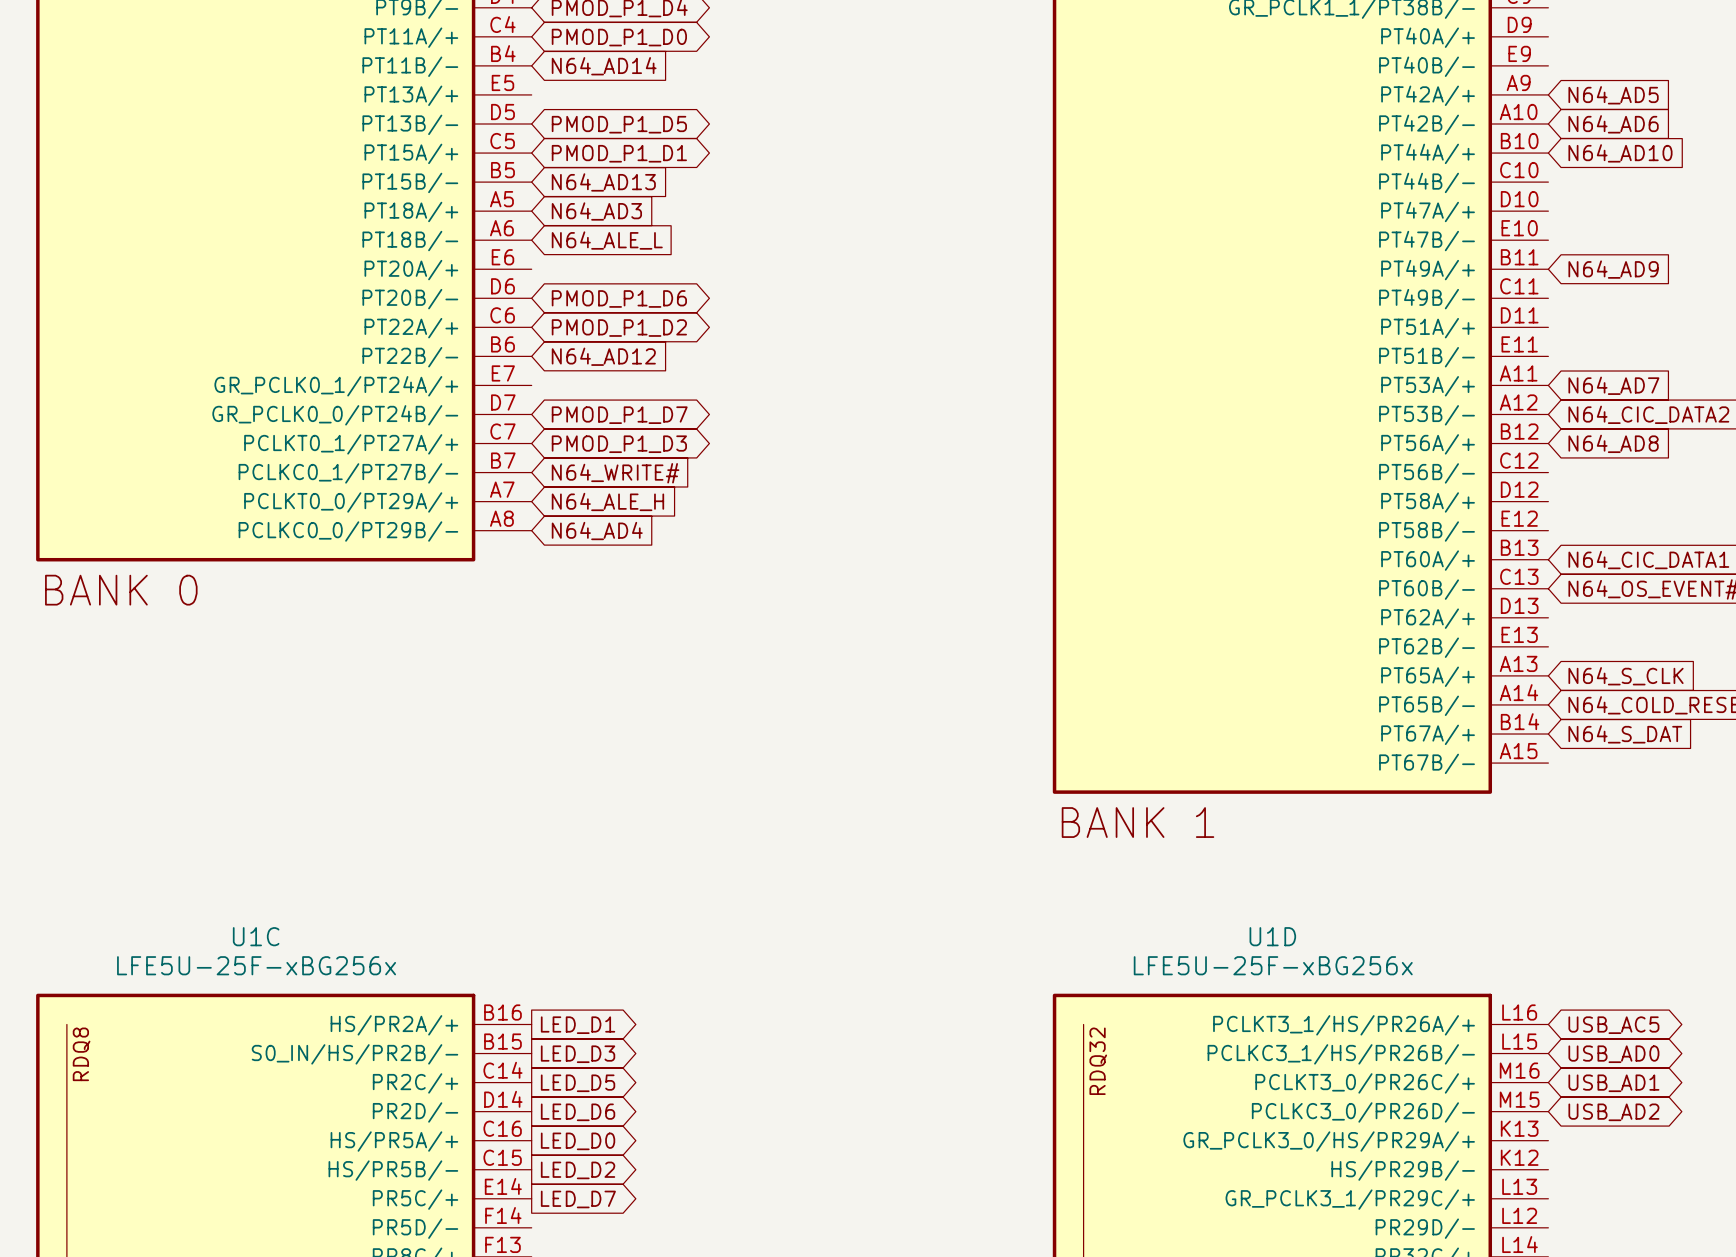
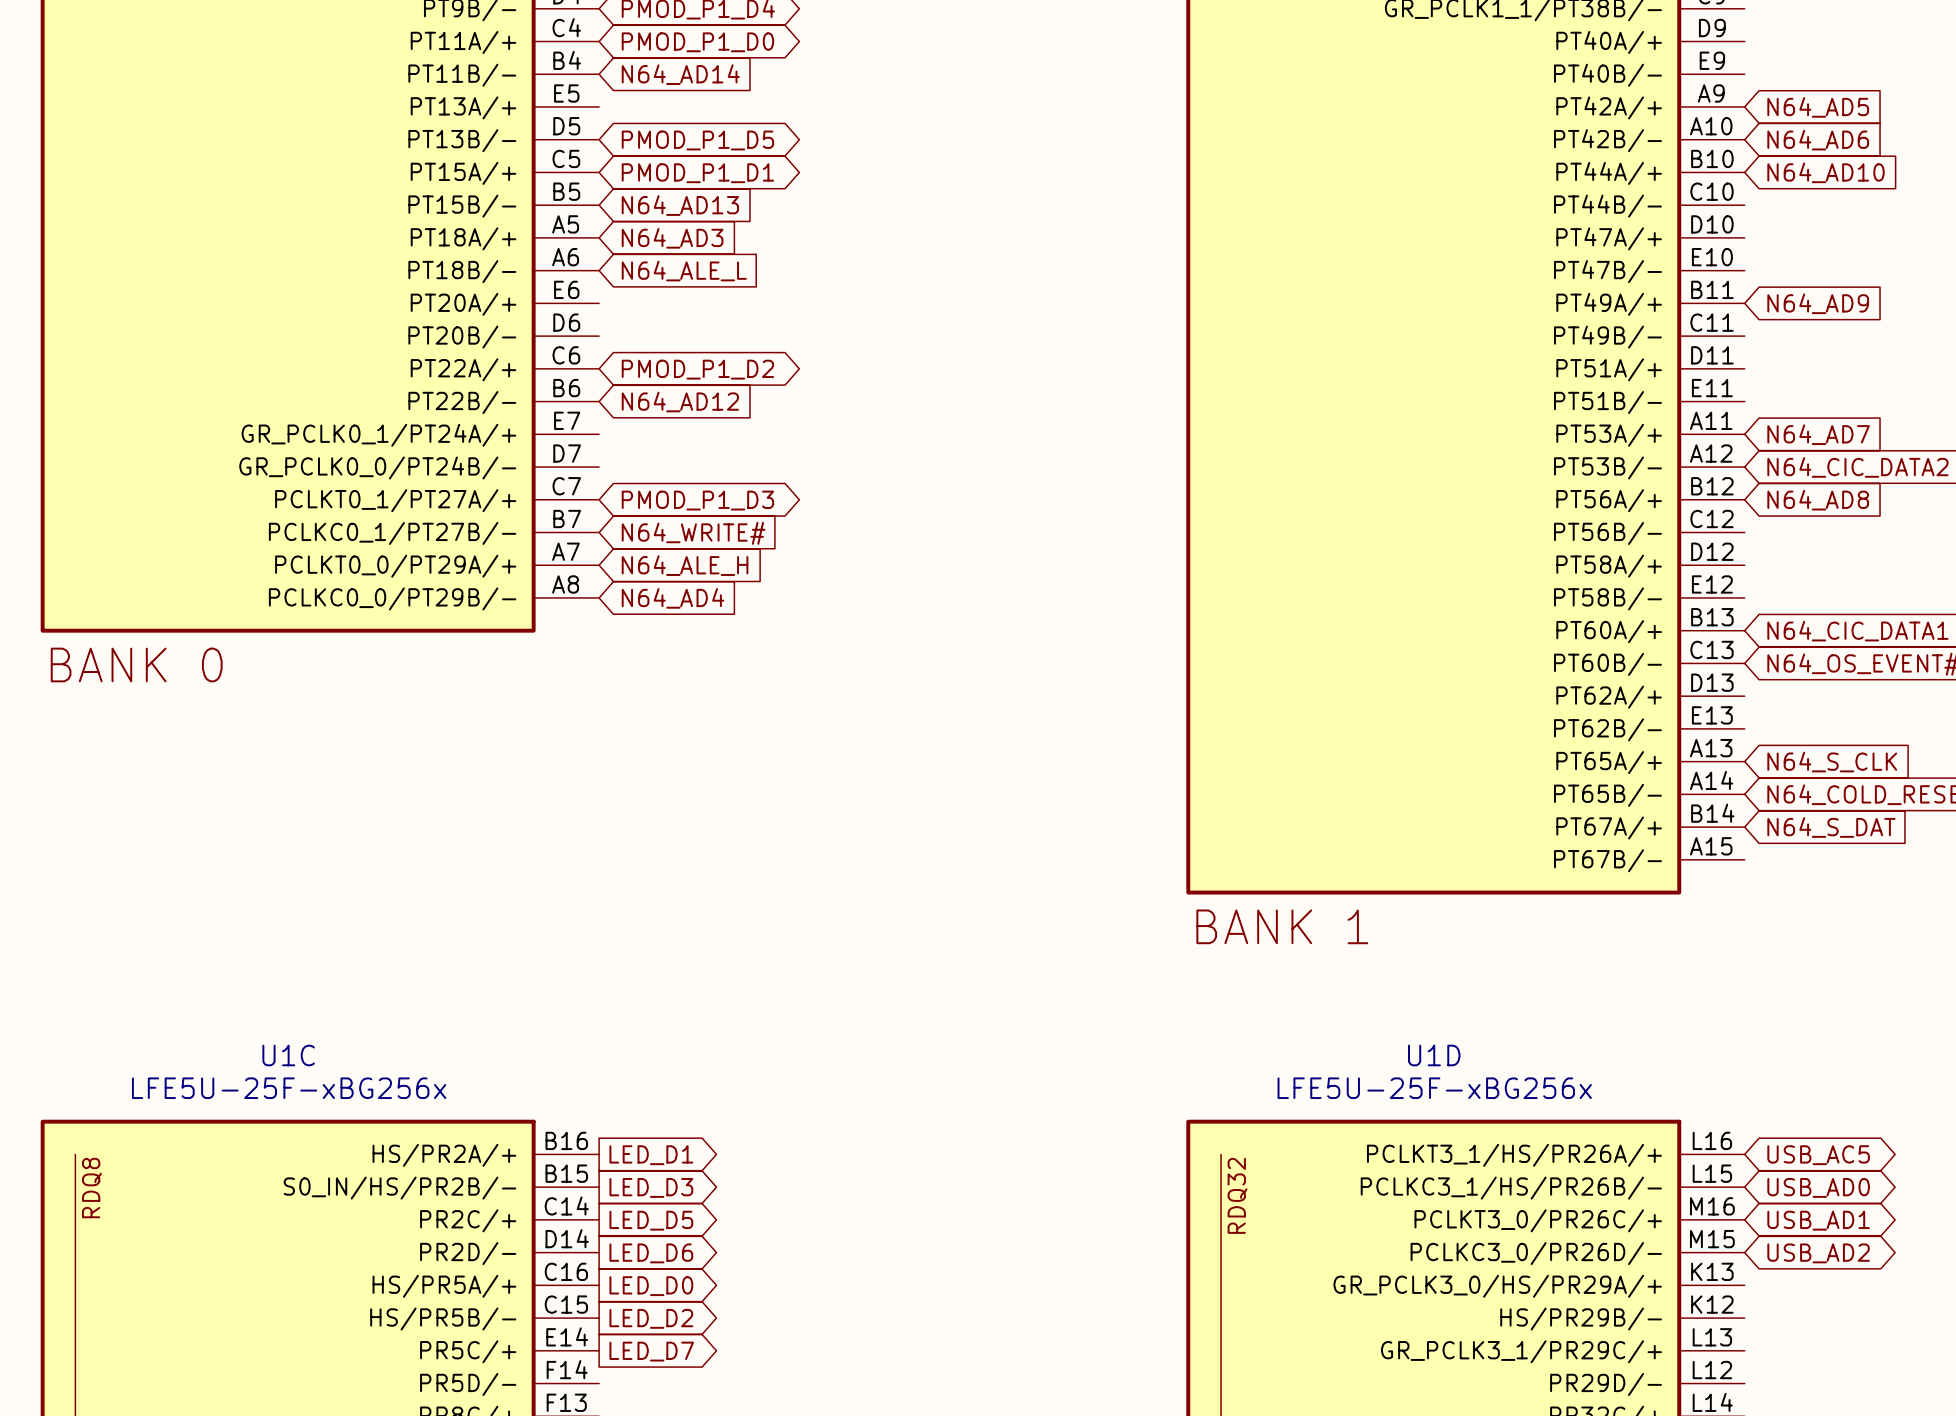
global label: PMOD_P1_D6 (619, 298) -> none
global label: PMOD_P1_D7 (619, 415) -> none

